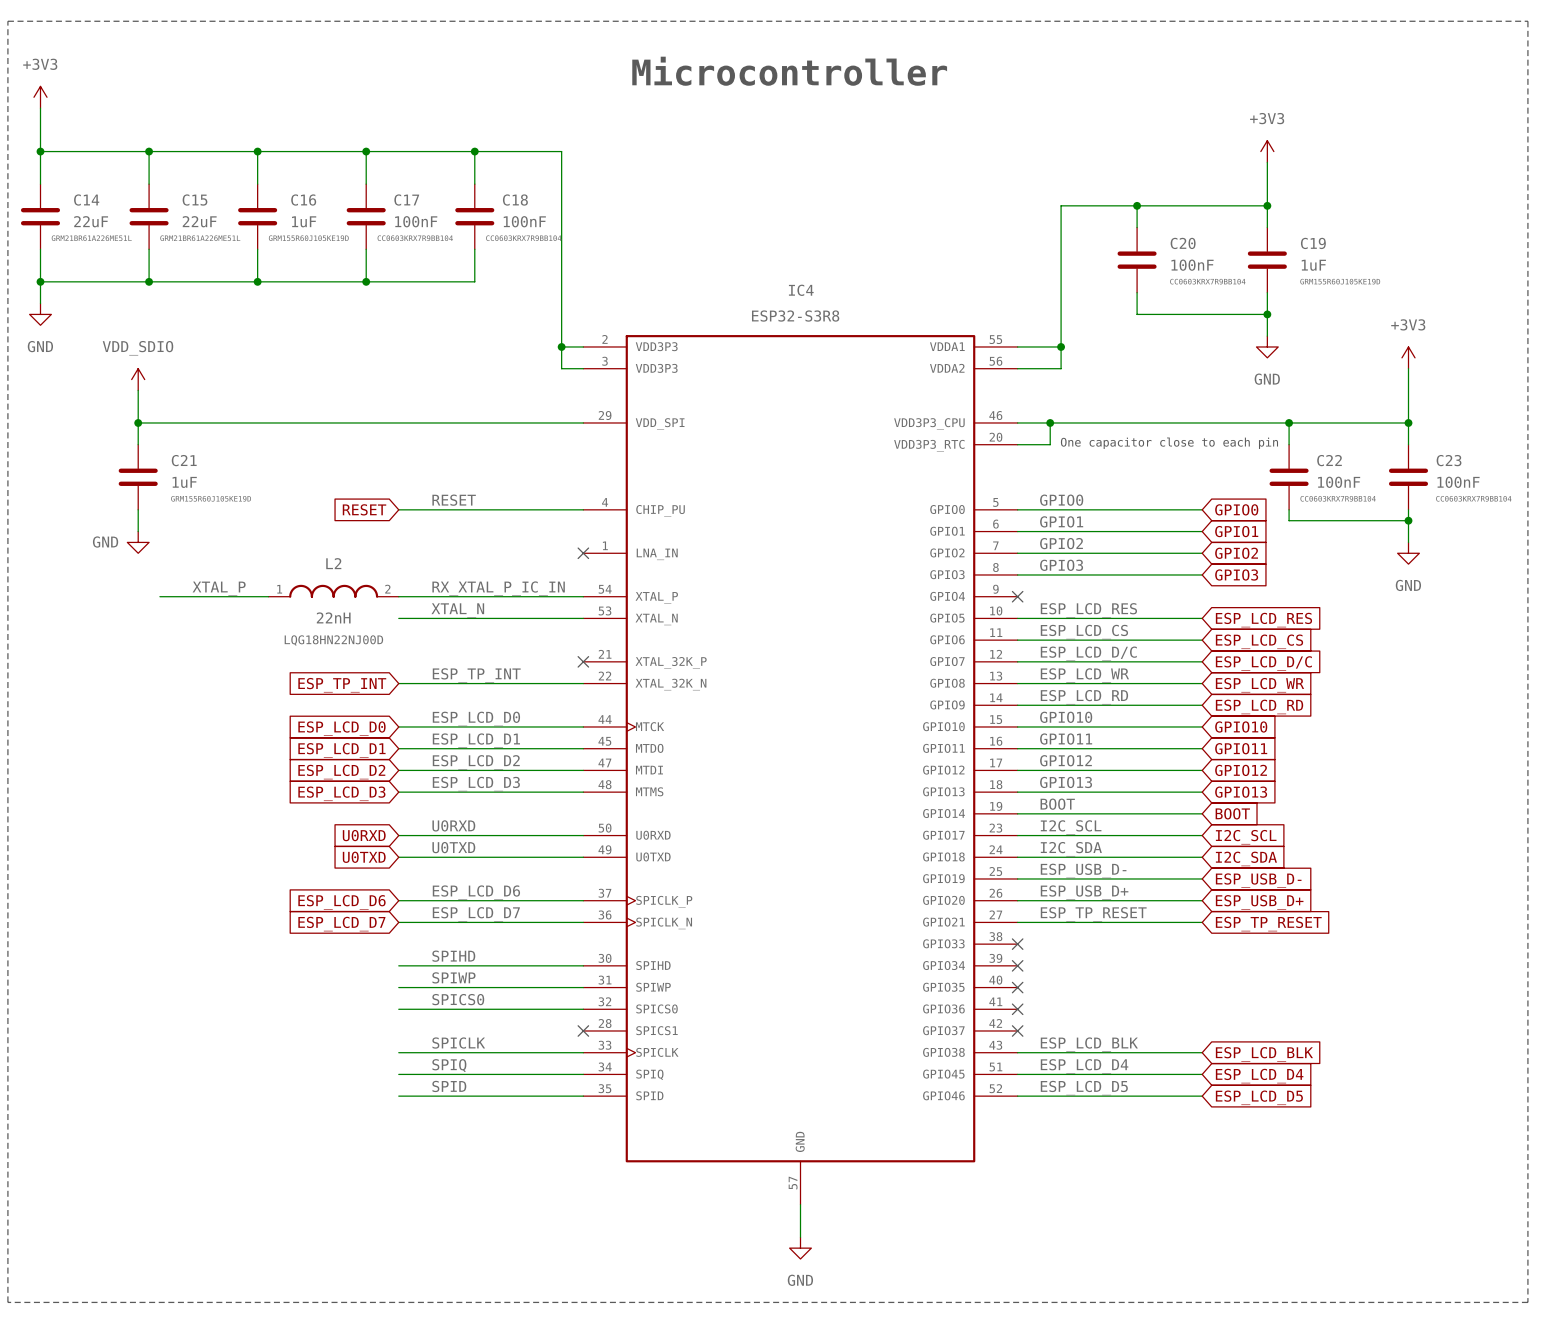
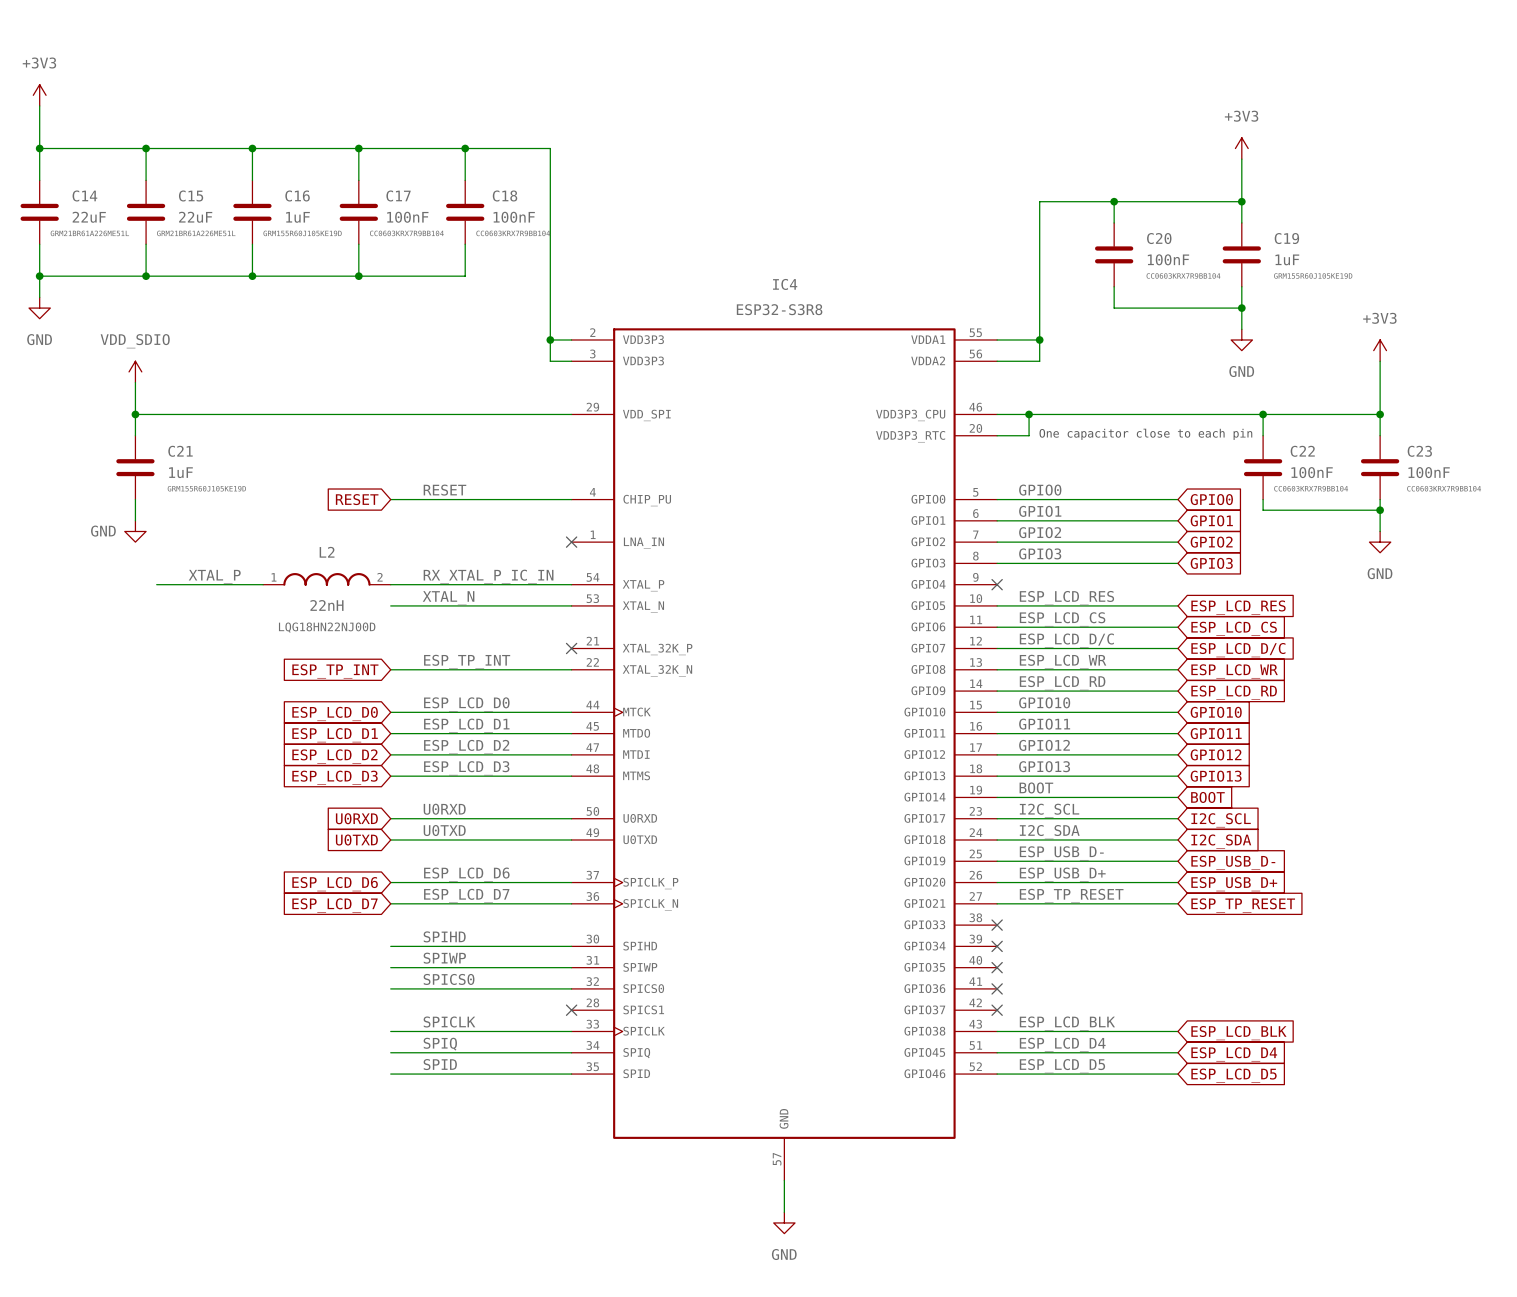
line: (7, 21) (1527, 21) (1527, 1302) (7, 1302) (7, 21) -> none
text: Microcontroller (789, 71) -> none

